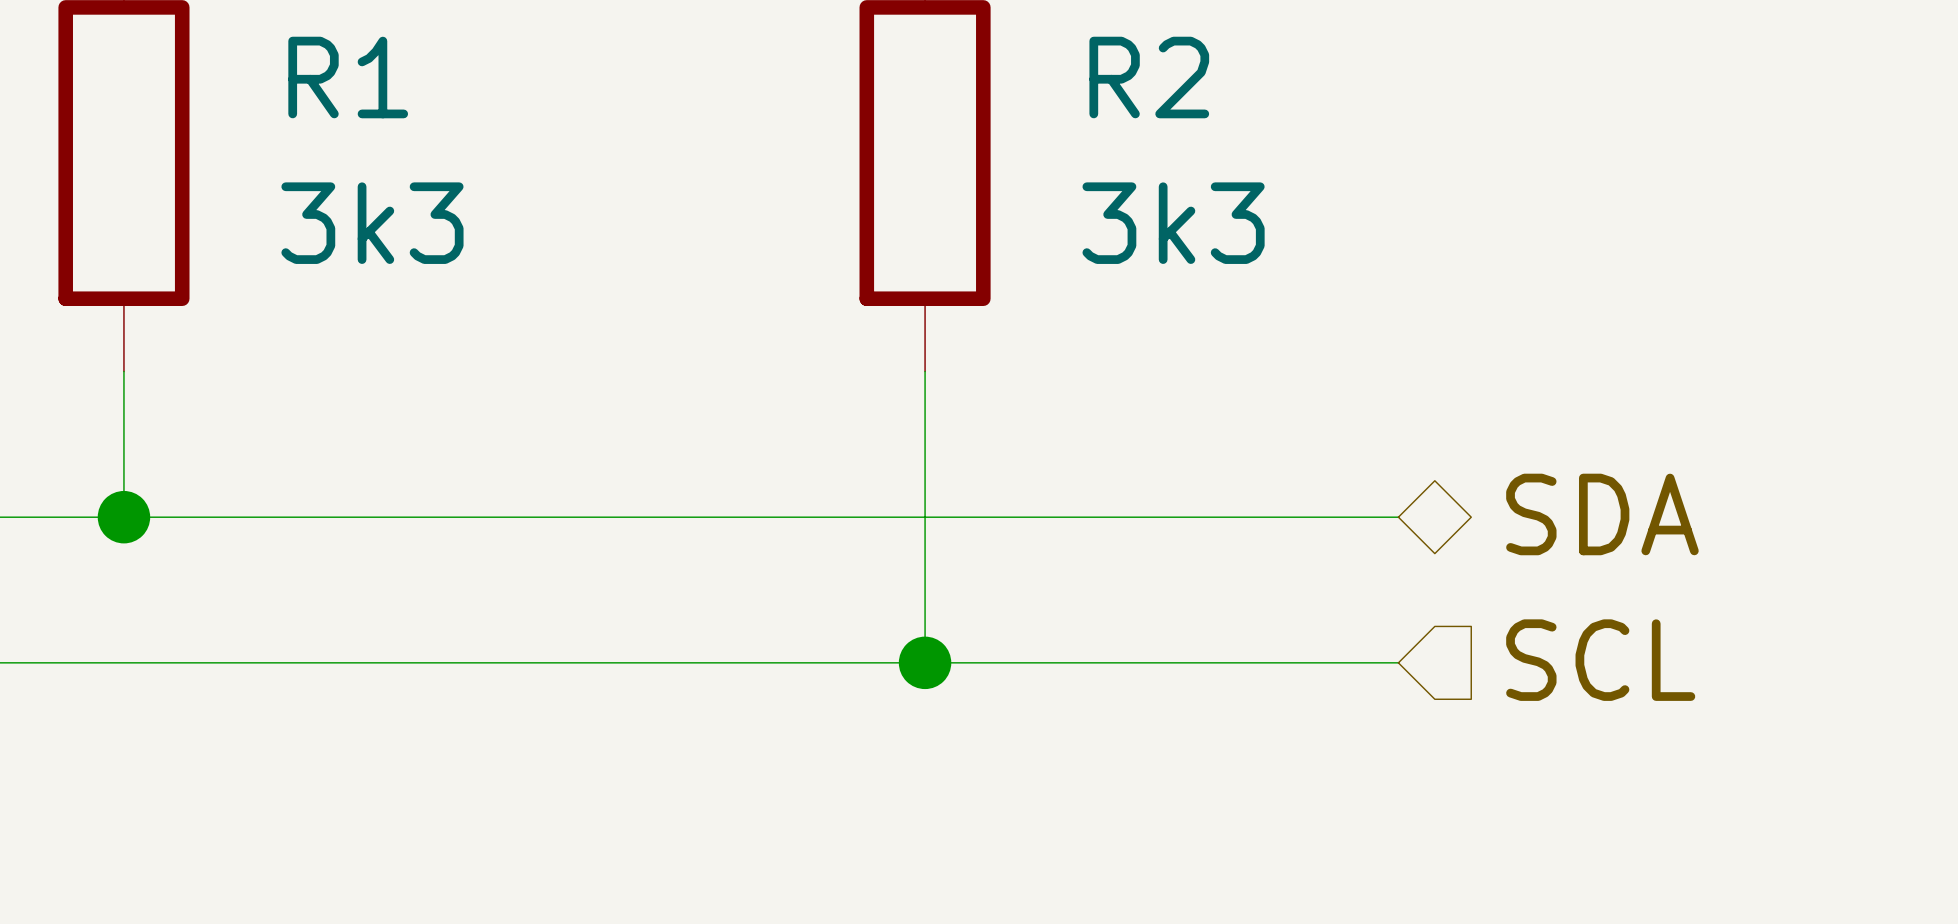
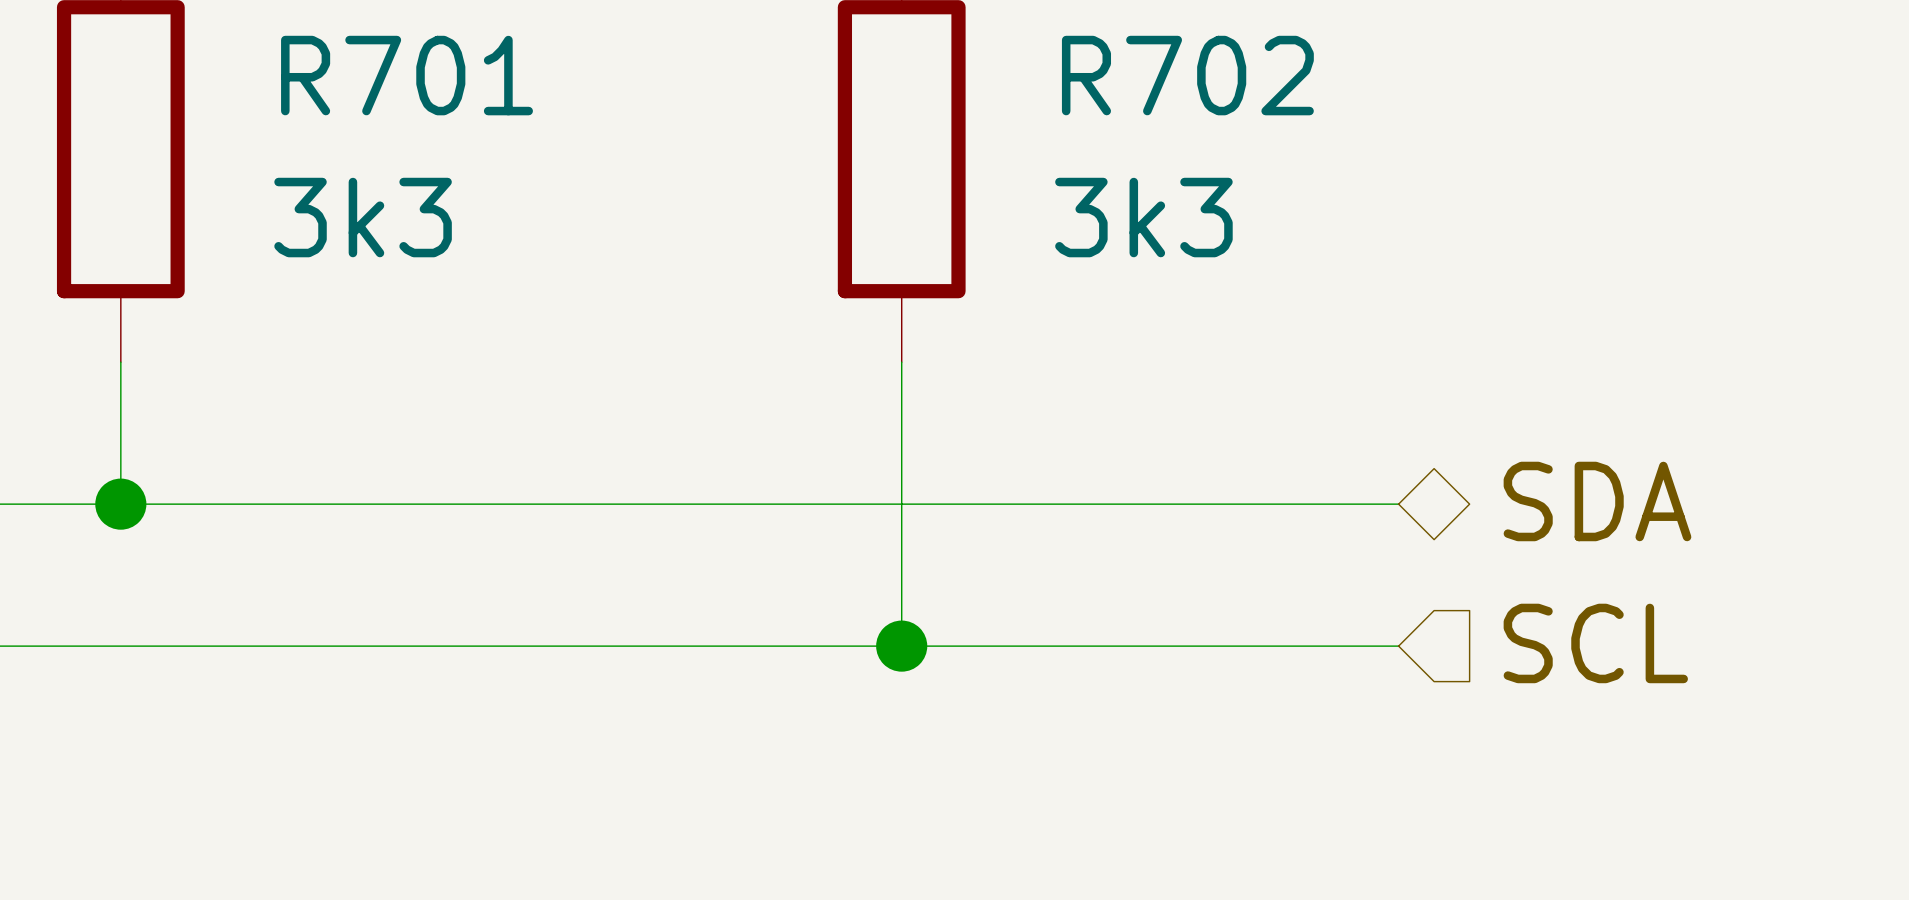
R1 name: R1 (348, 77) -> R701 (407, 75)
R2 name: R2 (1149, 77) -> R702 (1187, 75)
hierarchical label position: SDA (1602, 514) -> SDA (1597, 501)
wire: none -> (1363, 504) (1398, 504)
hierarchical label position: SCL (1600, 660) -> SCL (1595, 643)
wire: none -> (1363, 646) (1398, 646)

